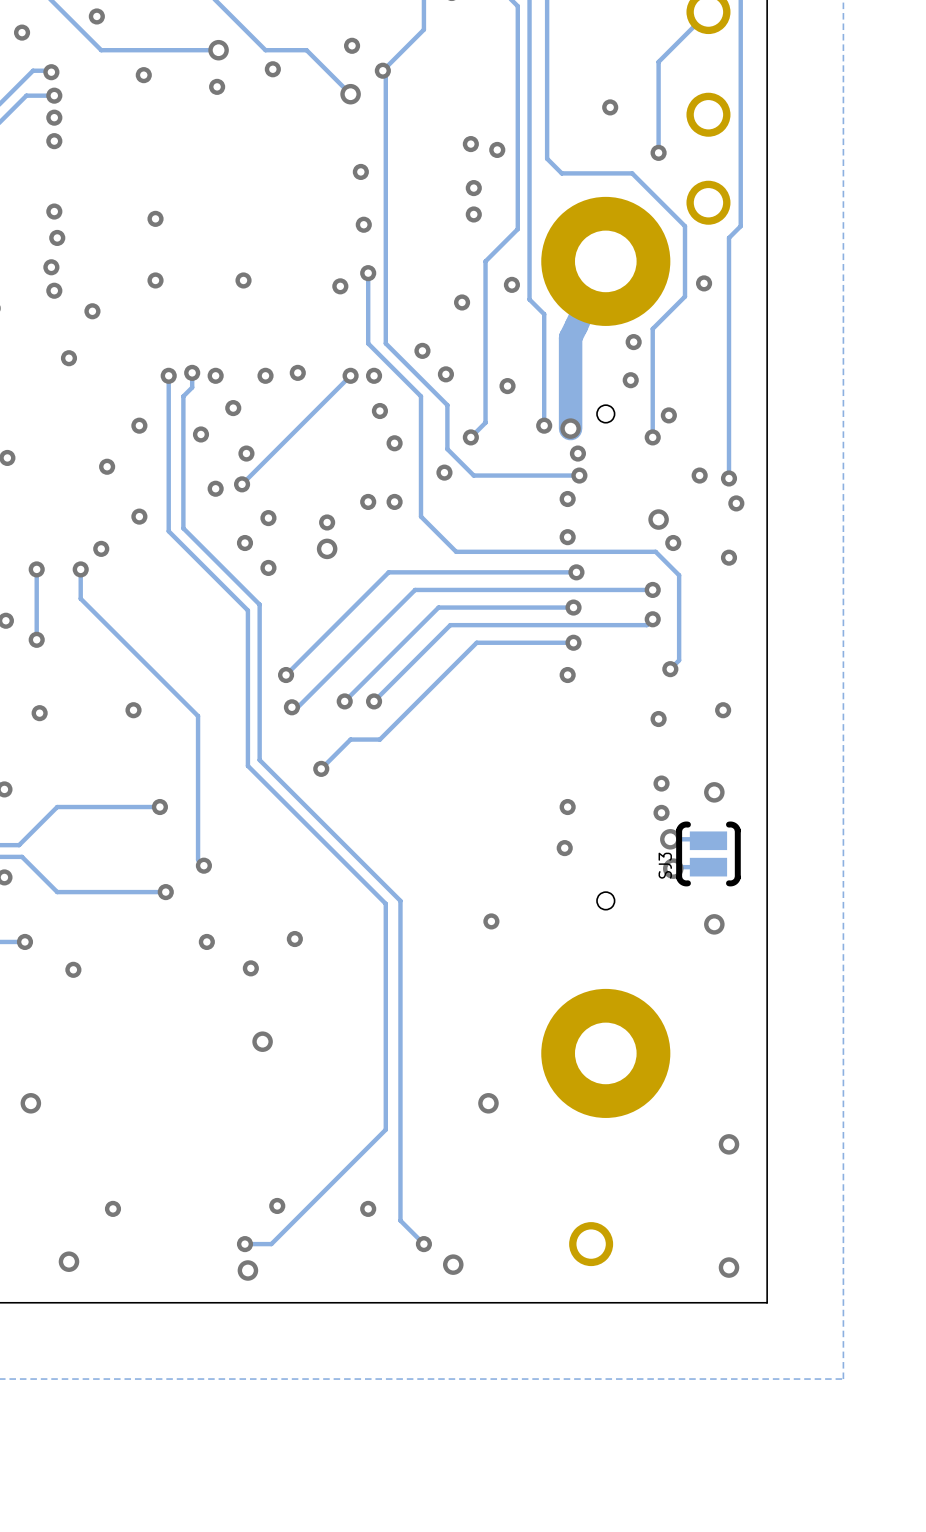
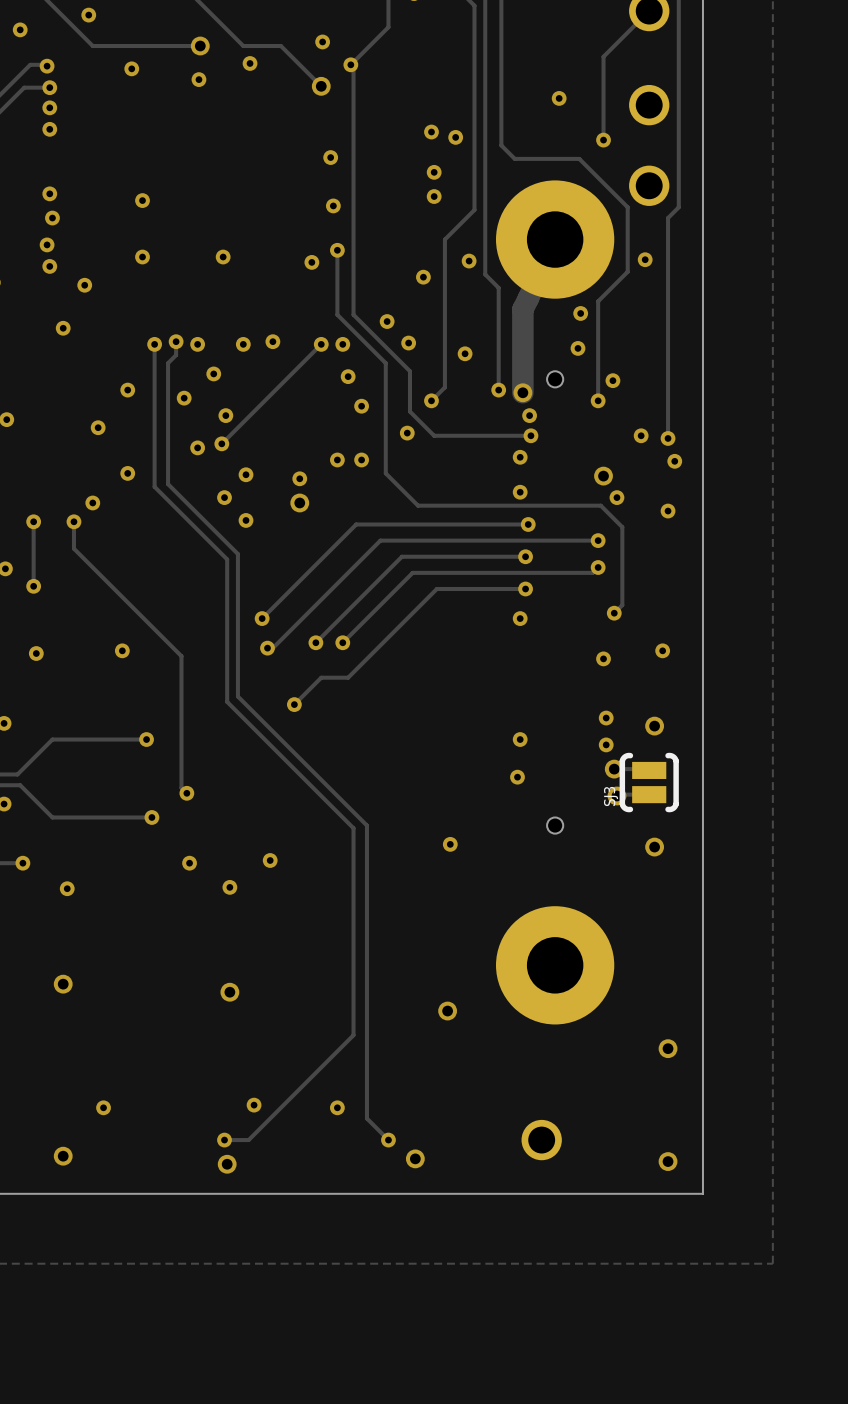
via position: (262, 1041) -> (229, 992)
via position: (30, 1103) -> (63, 984)

